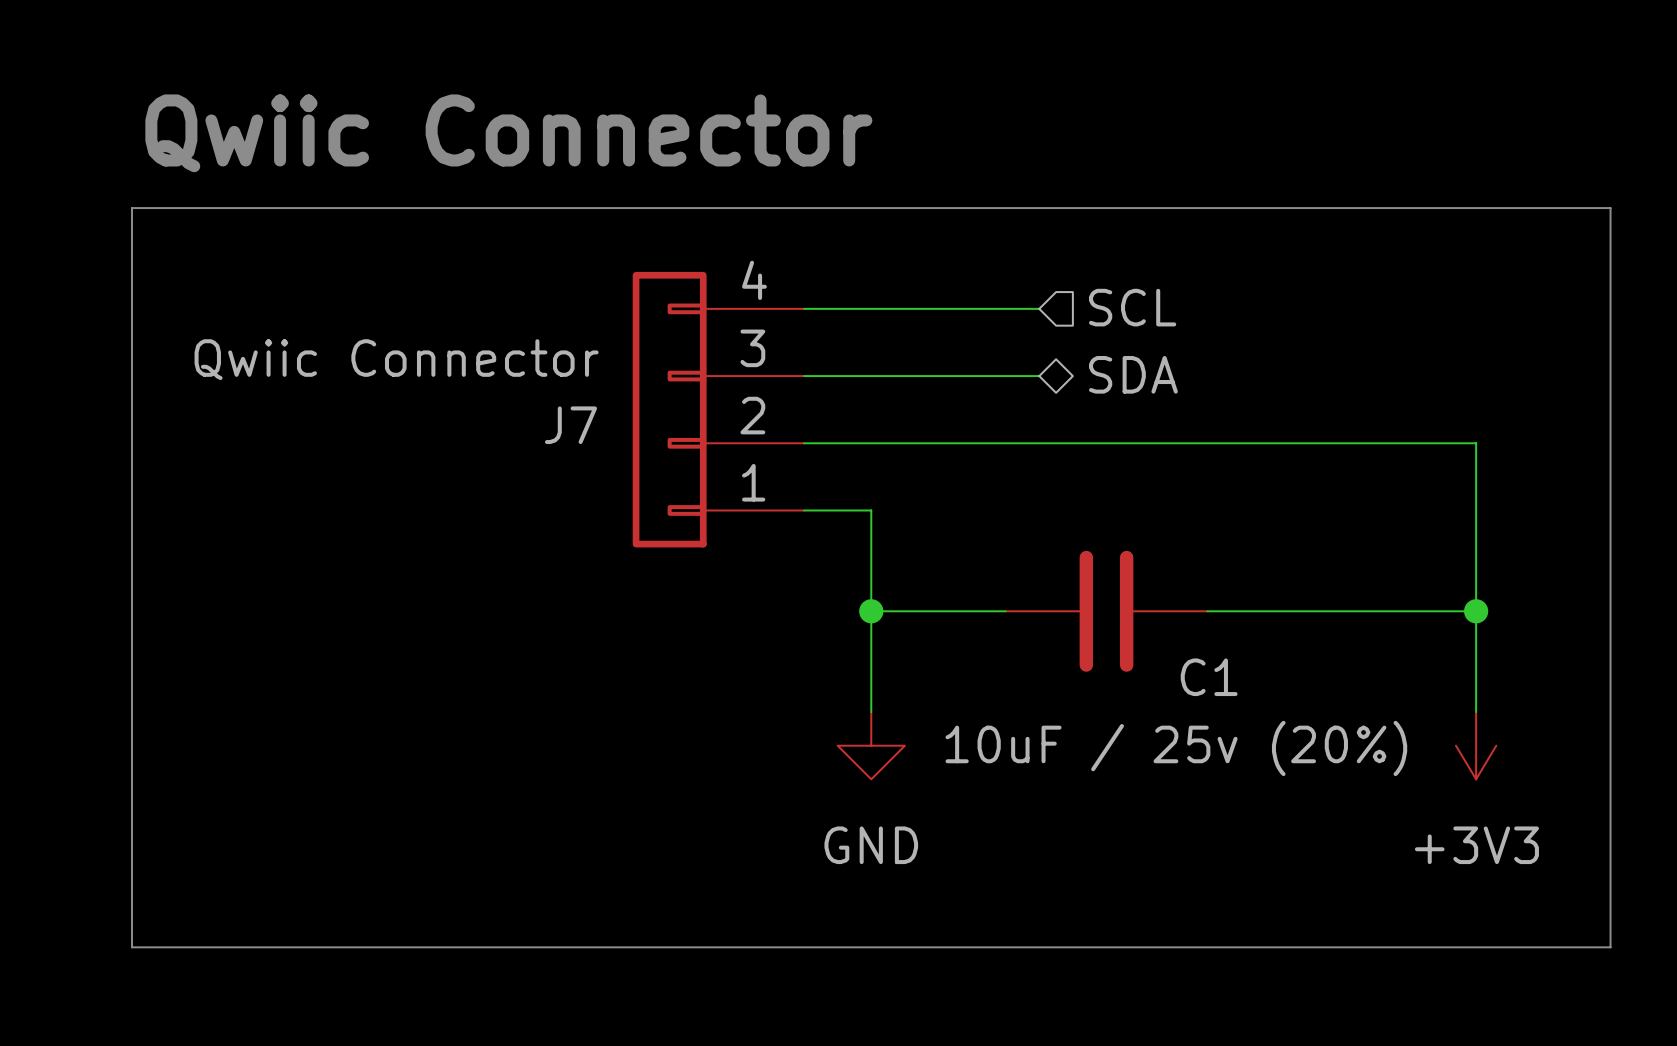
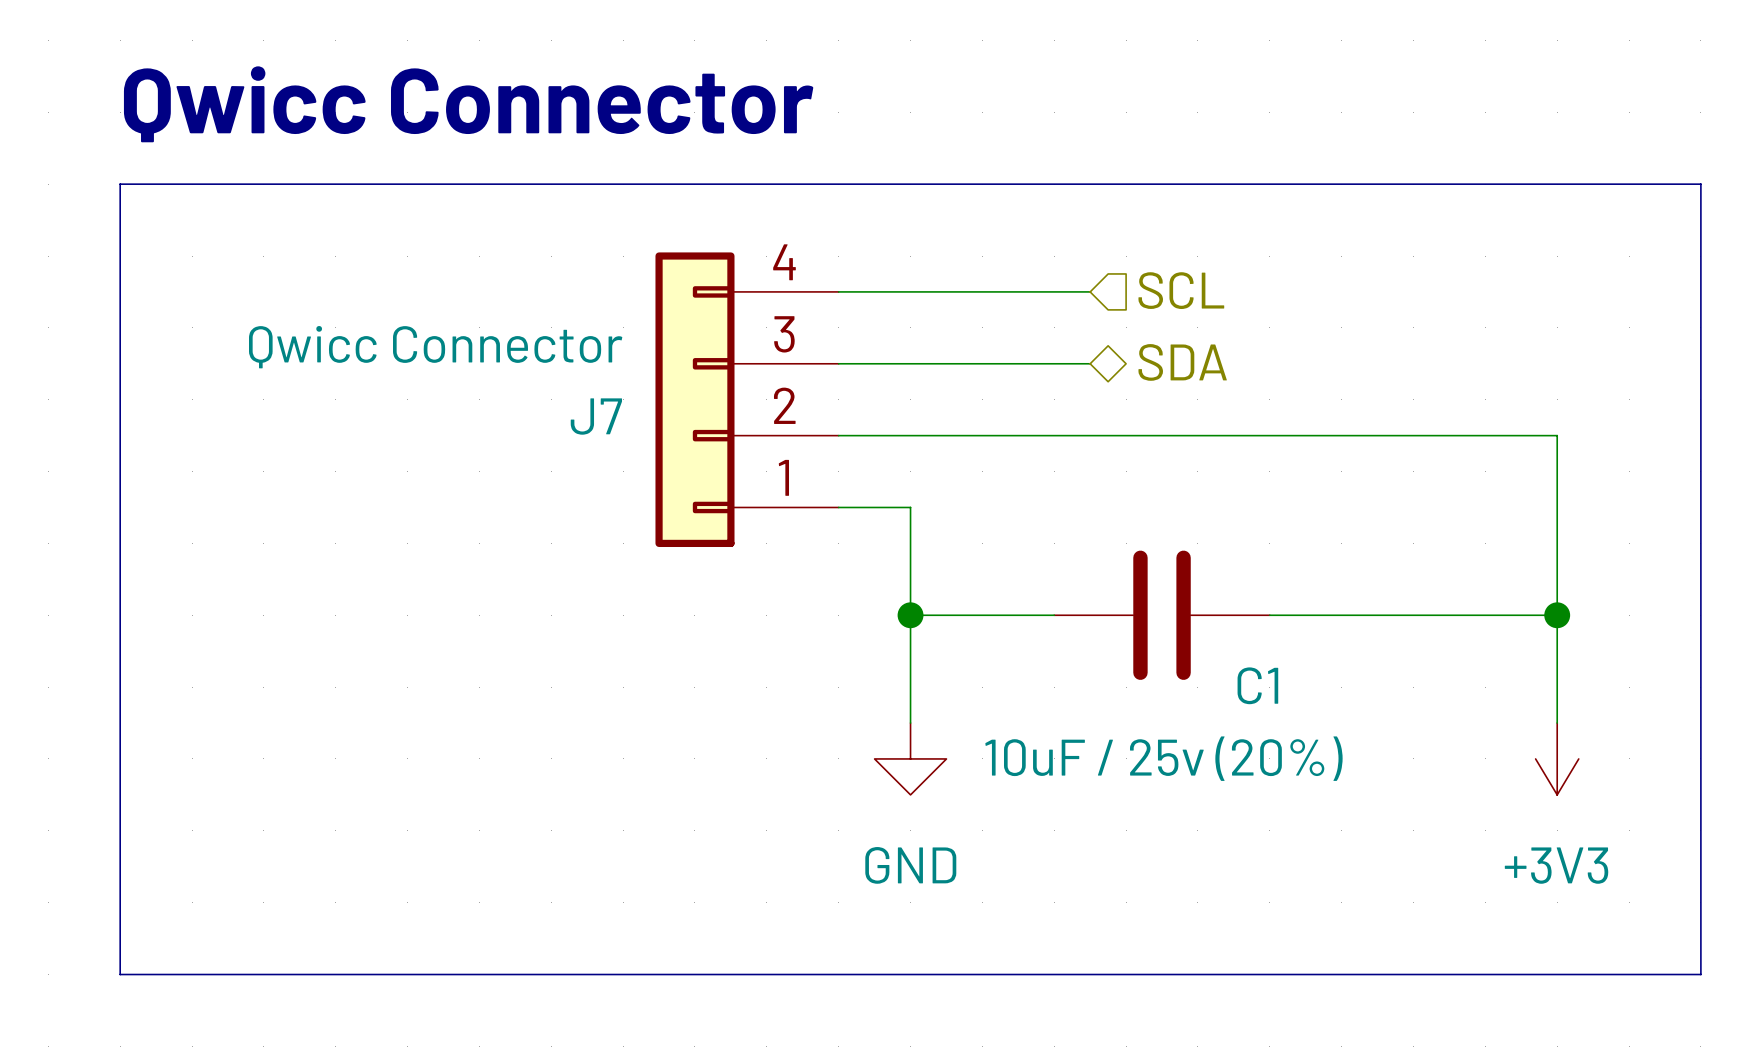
text: Qwiic Connector (508, 133) -> Qwicc Connector (468, 104)
J7 value: Qwiic Connector (396, 359) -> Qwicc Connector (435, 347)

